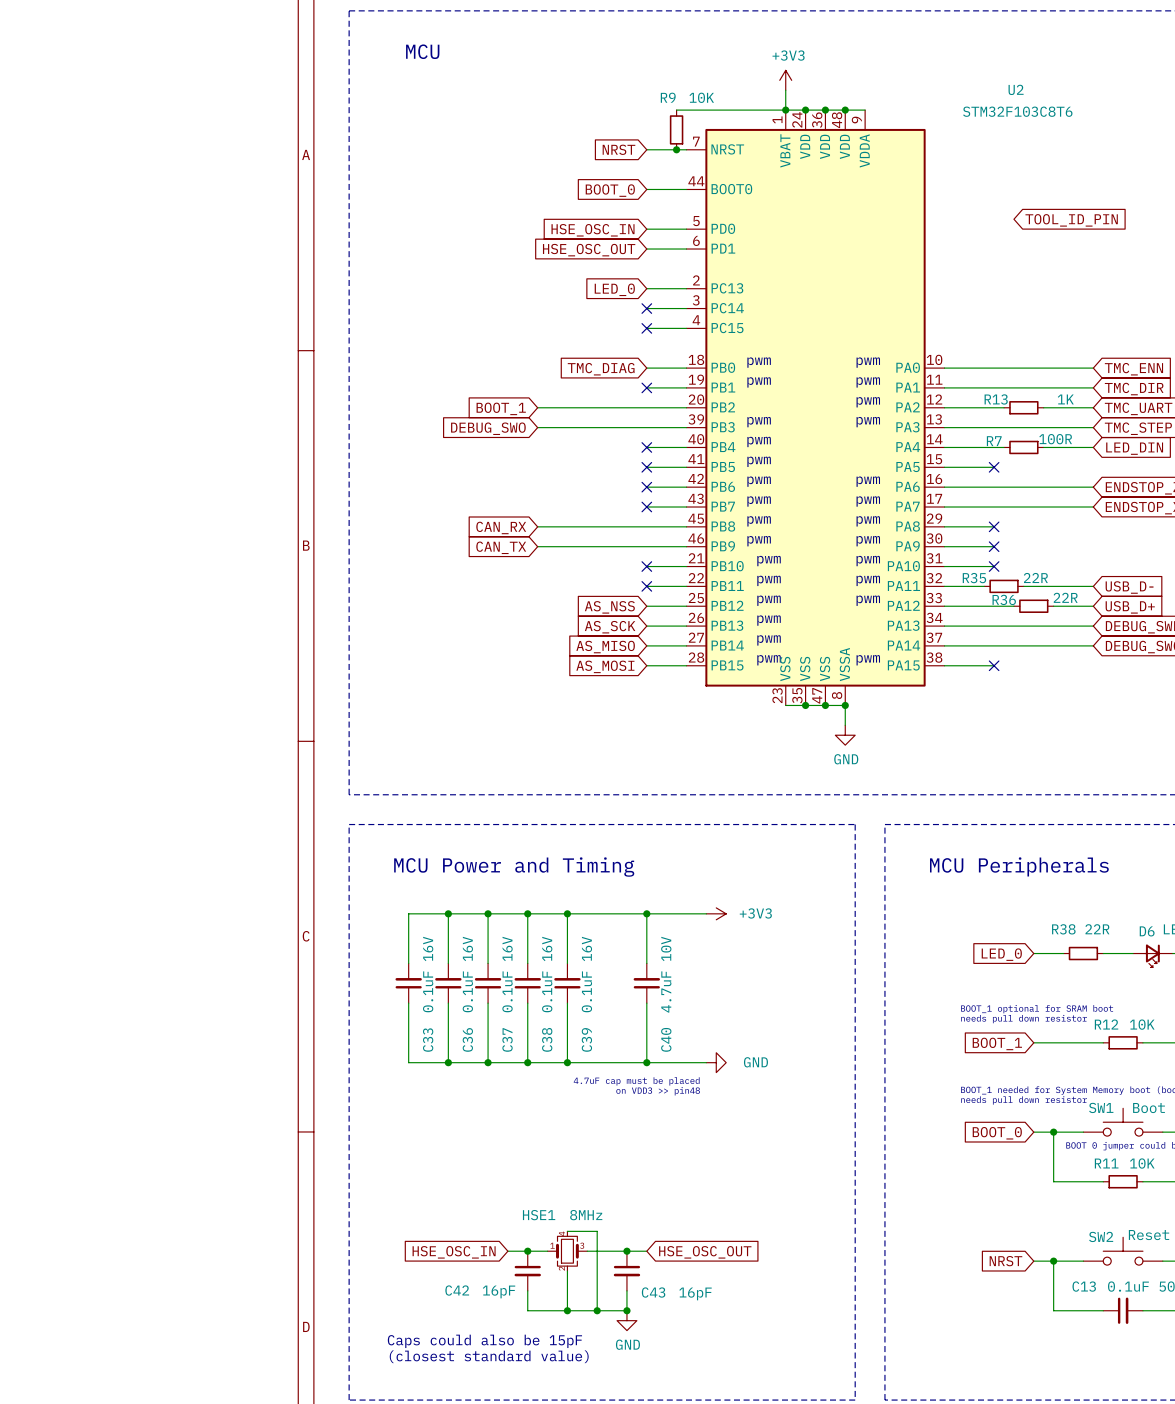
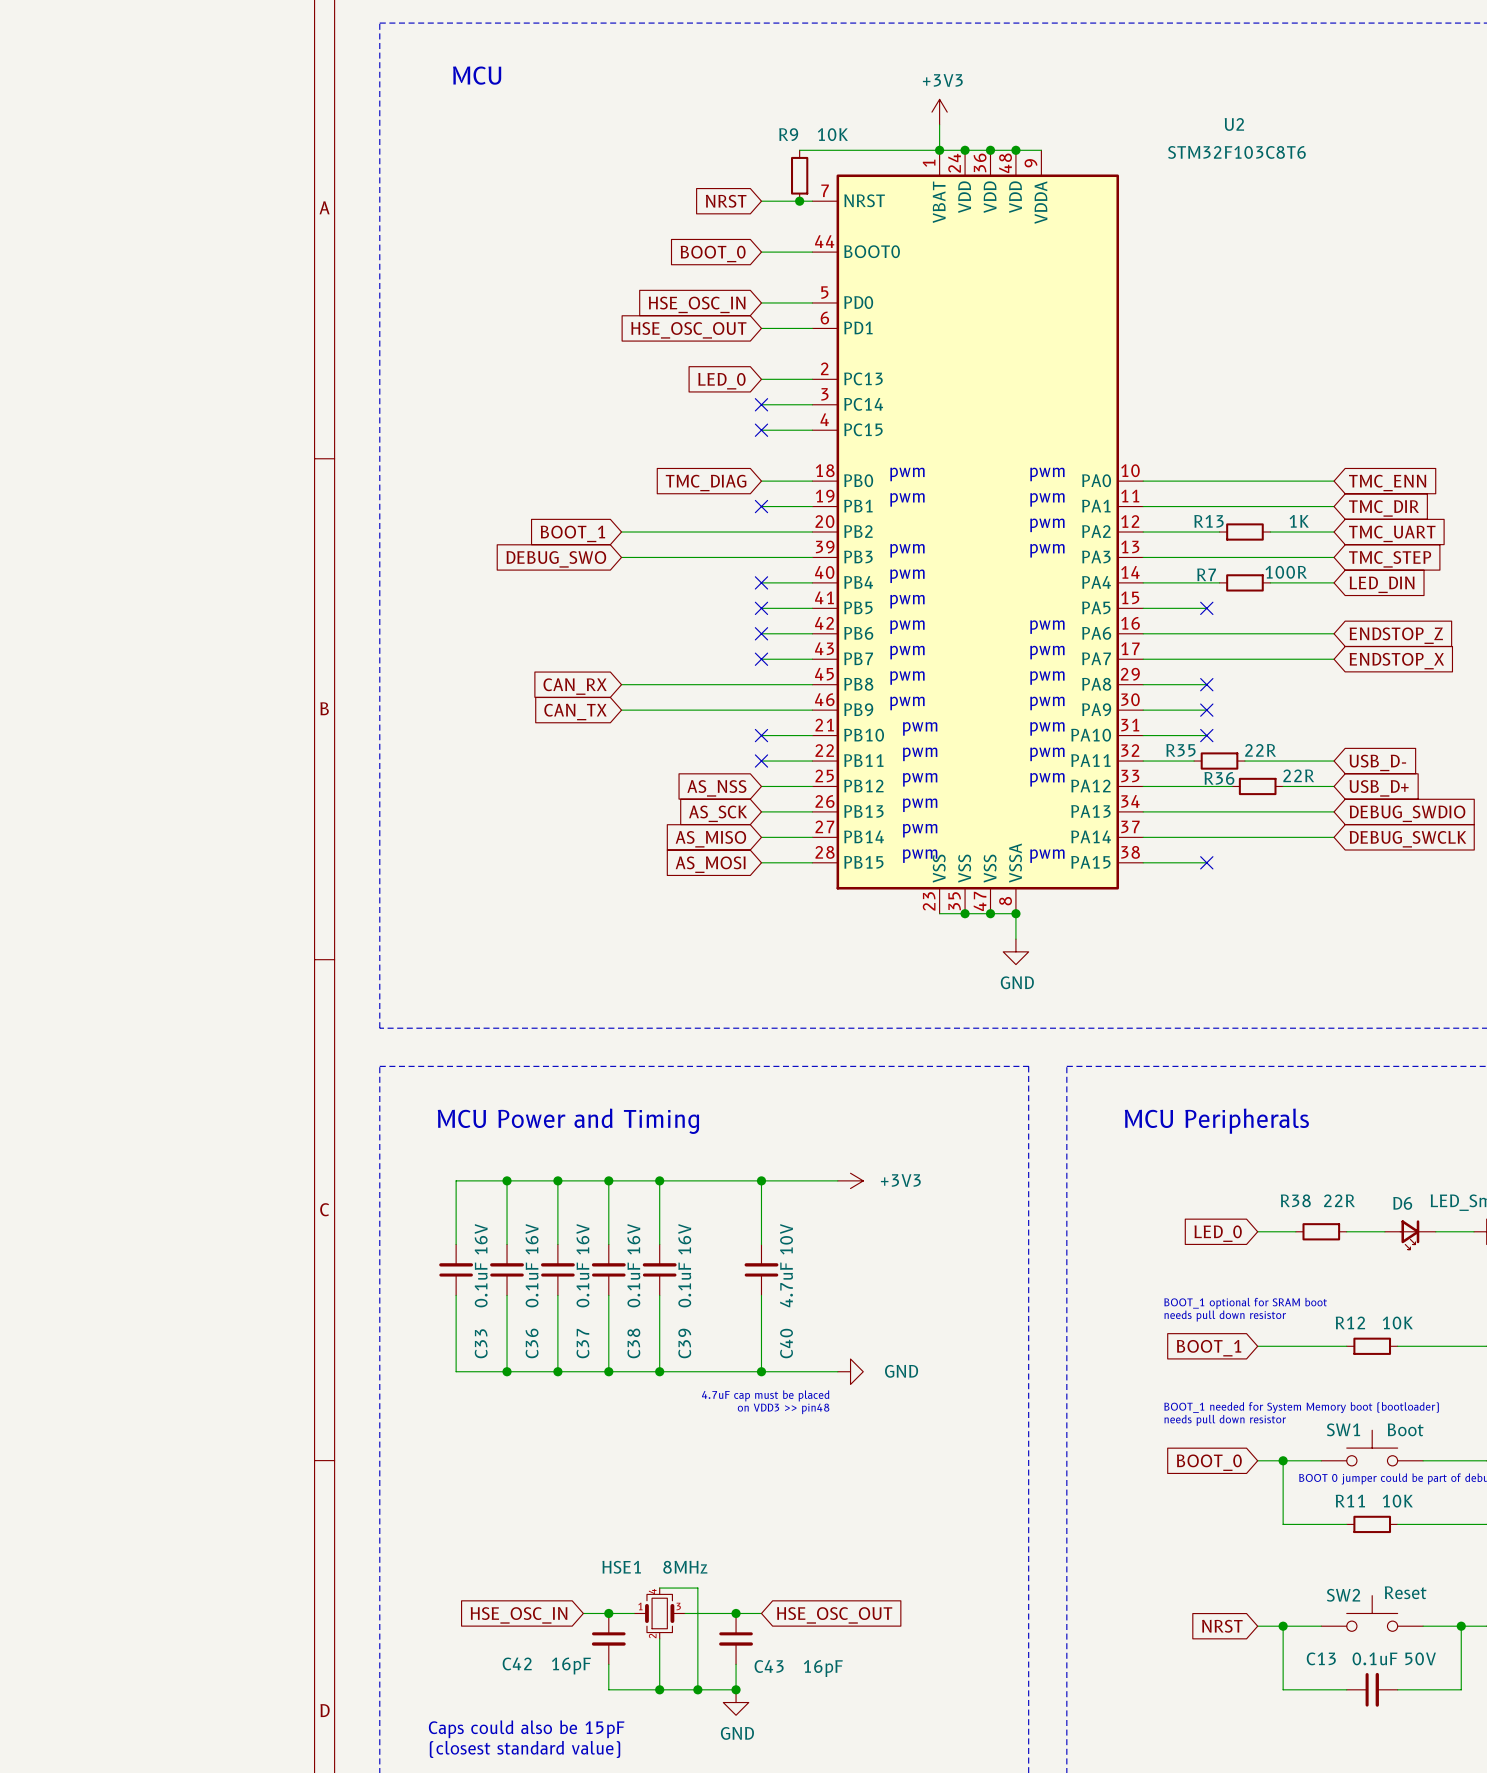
global label: TOOL_ID_PIN (1071, 220) -> none

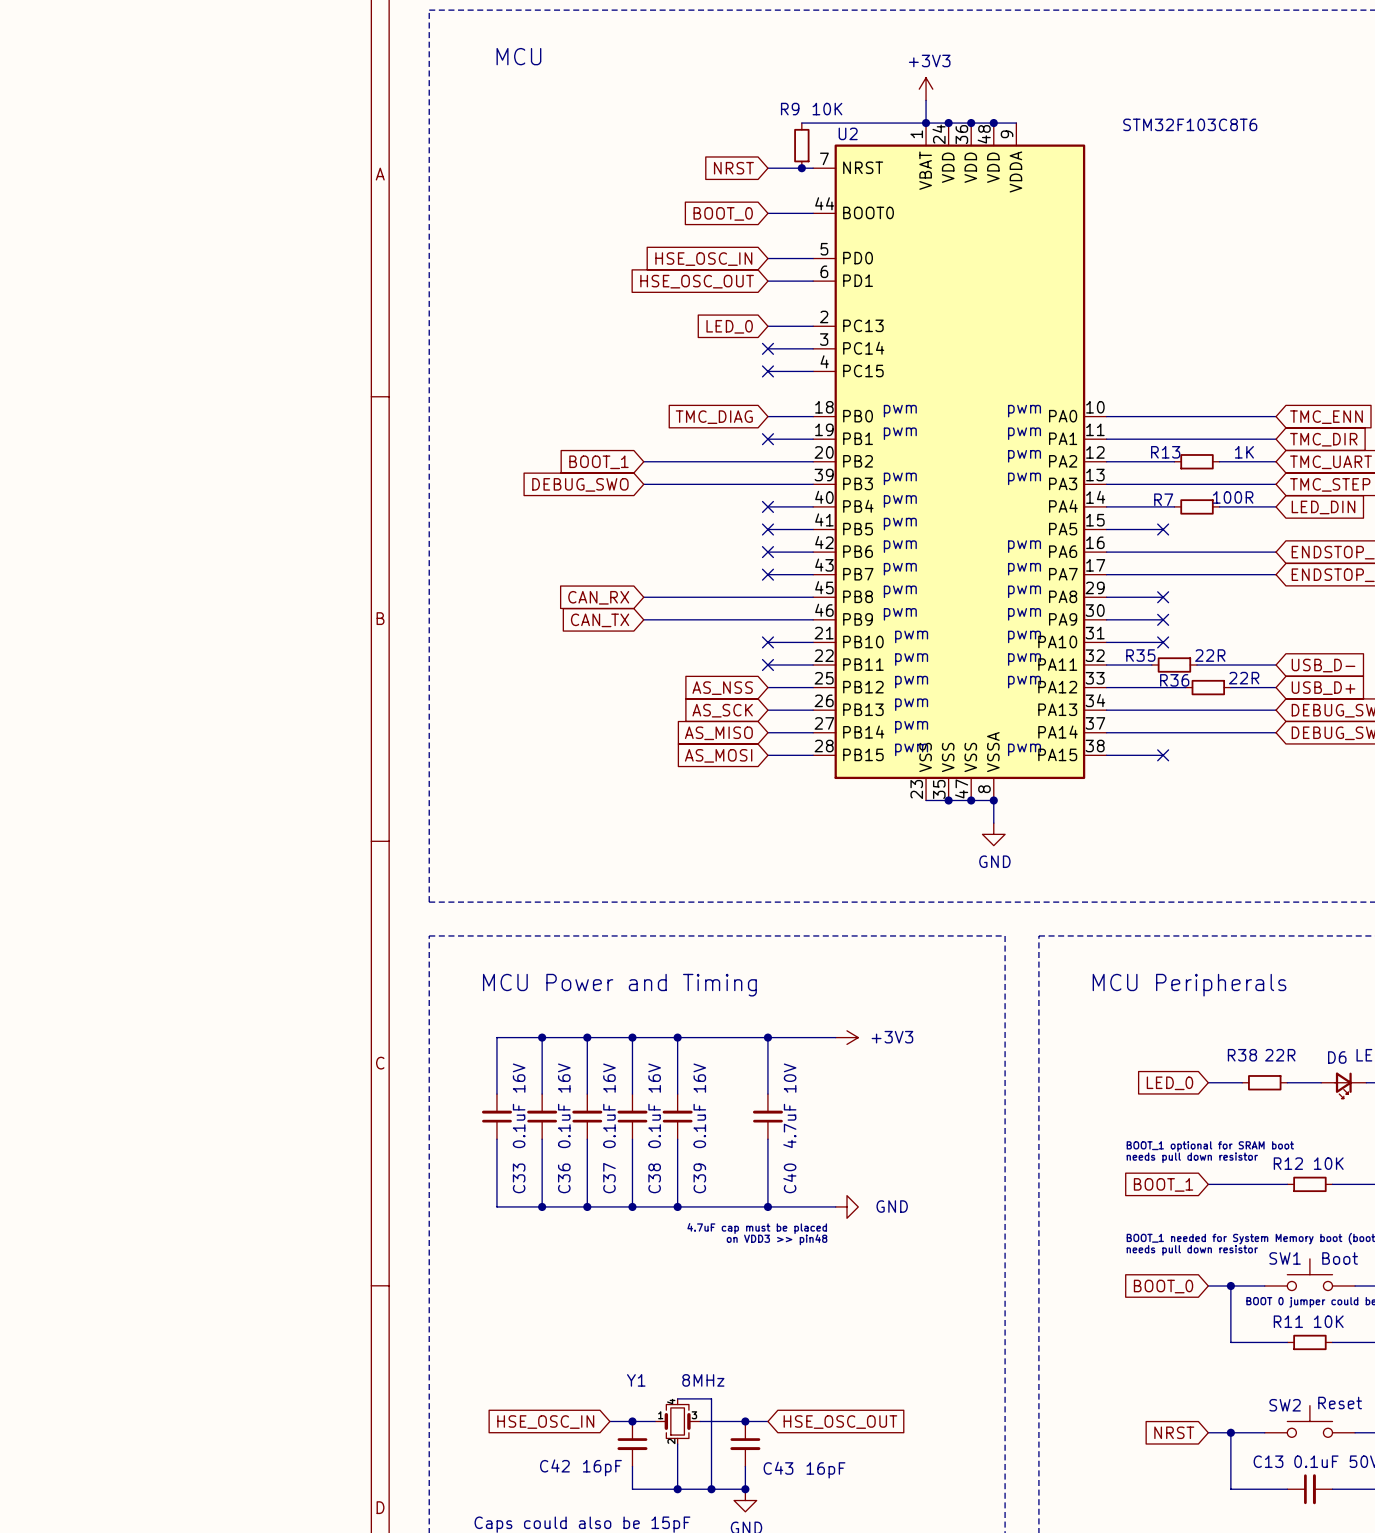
U2 name position: U2 (1234, 124) -> U2 (848, 133)
HSE1 name: HSE1 (621, 1567) -> Y1 (636, 1380)

